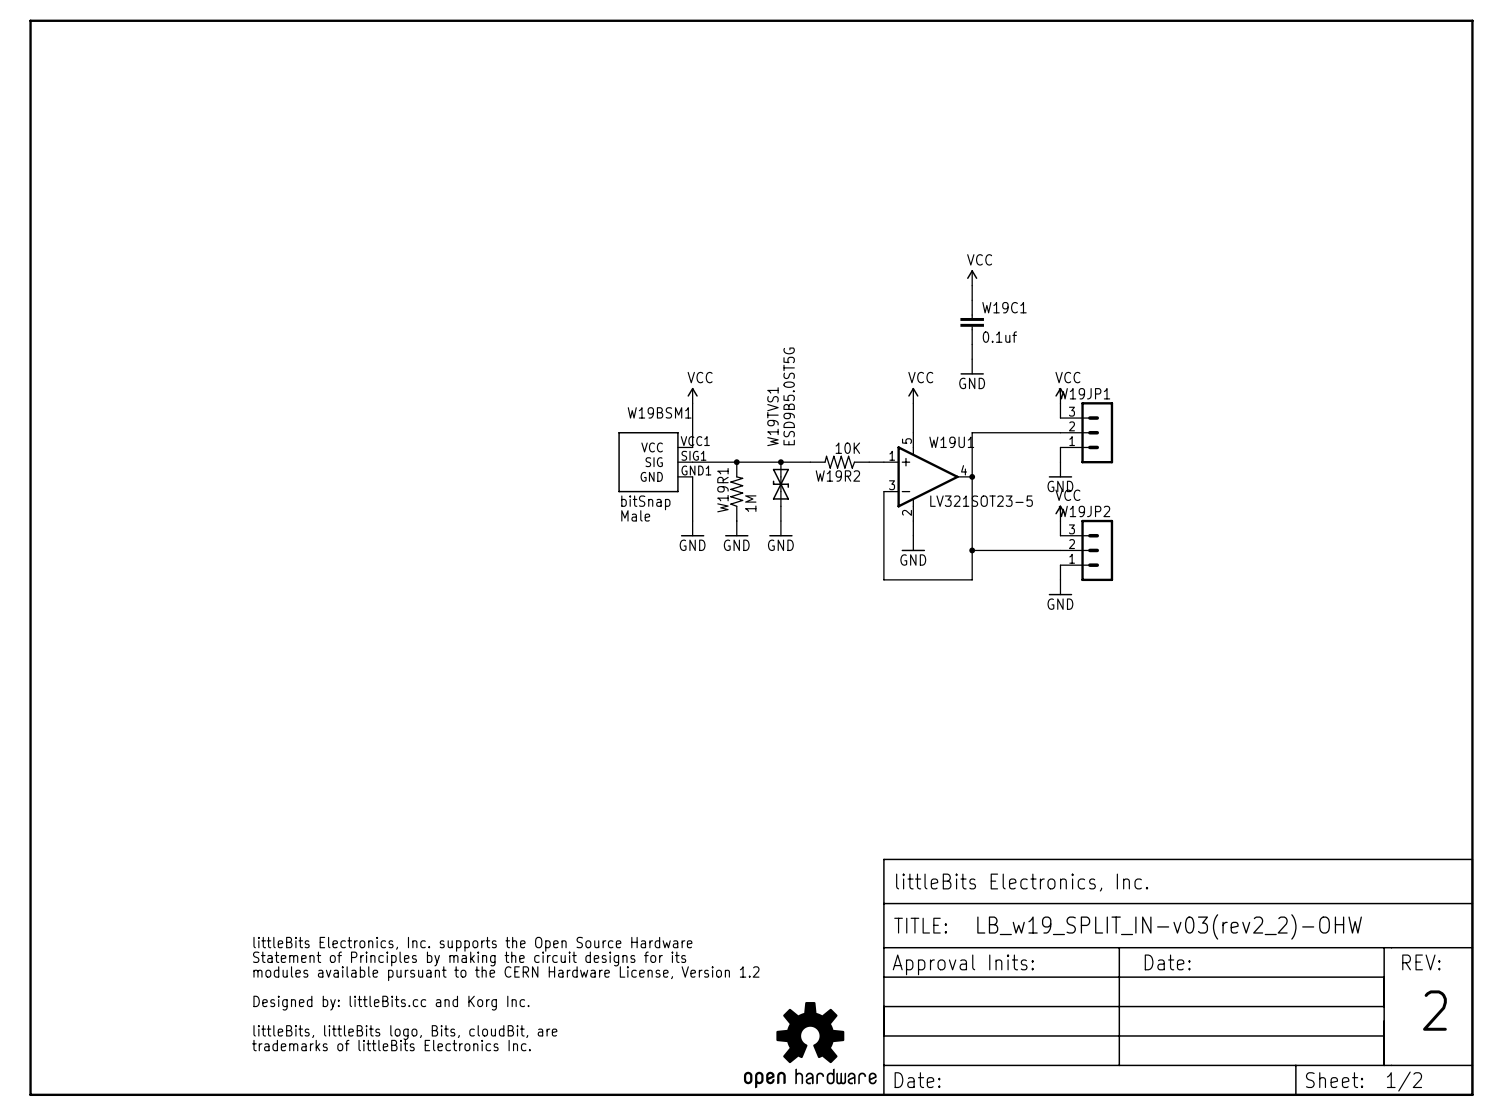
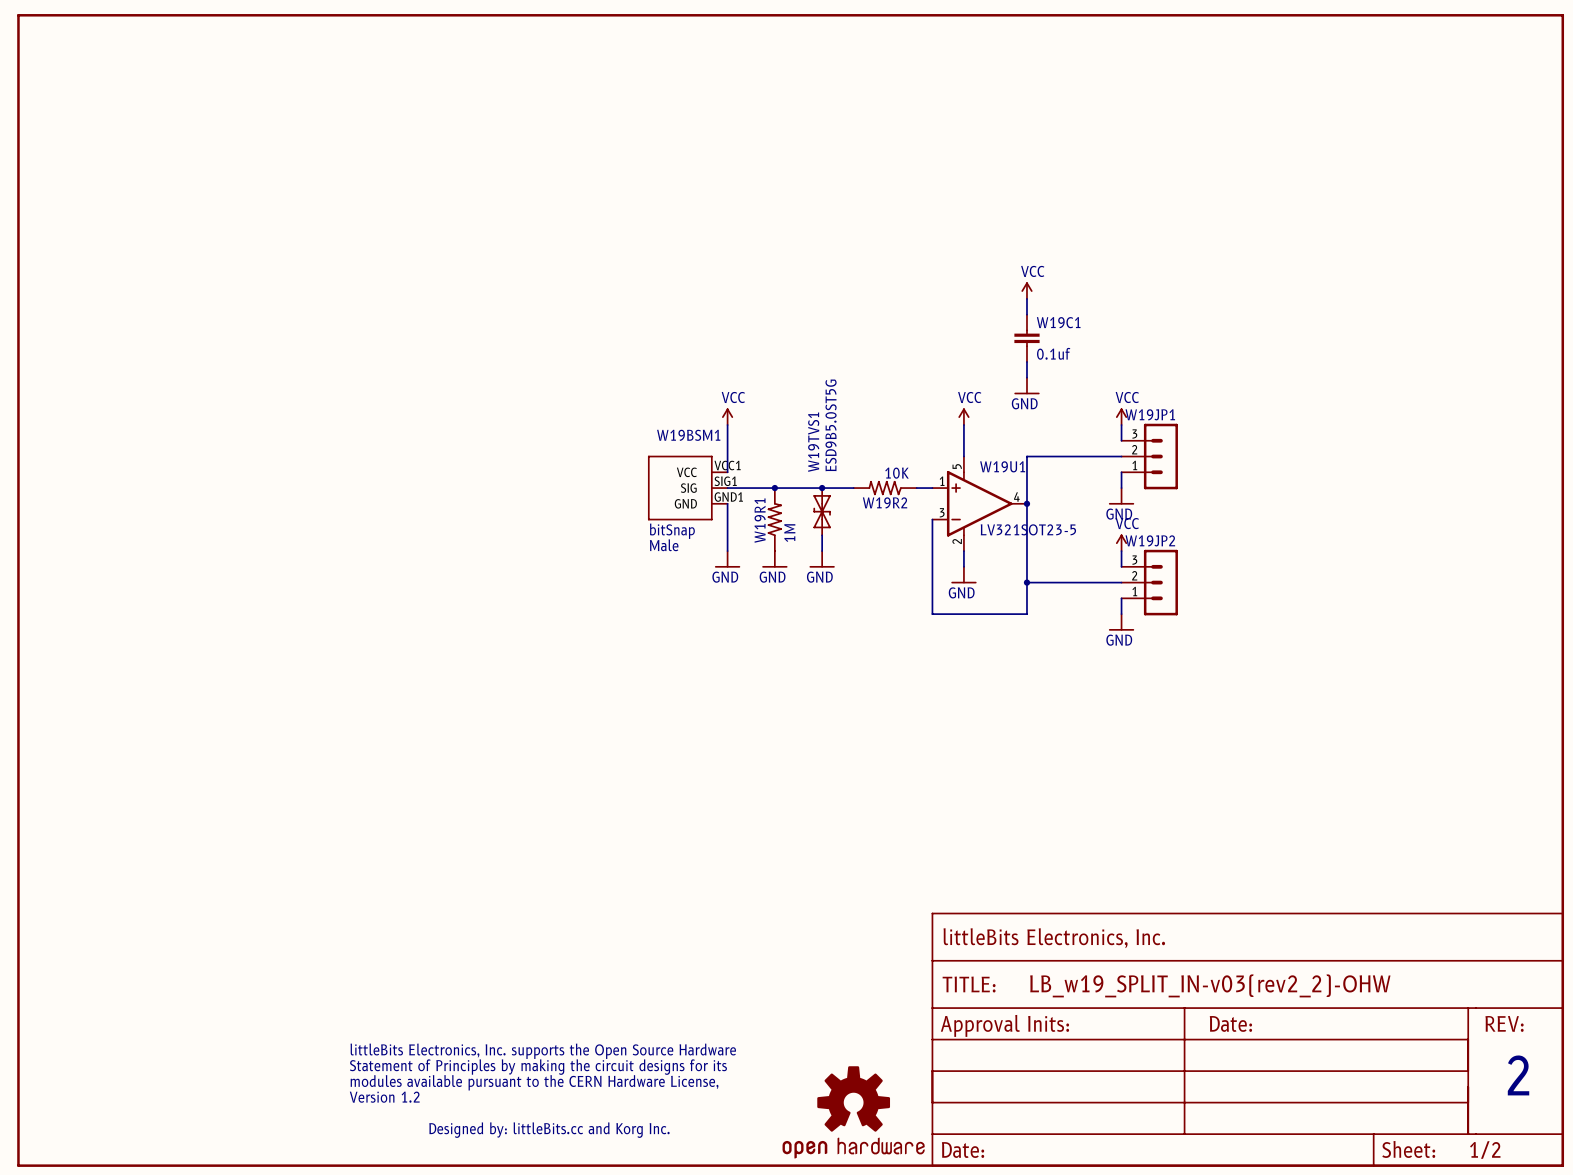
part: (505, 994) -> none
part: none -> (542, 1090)

